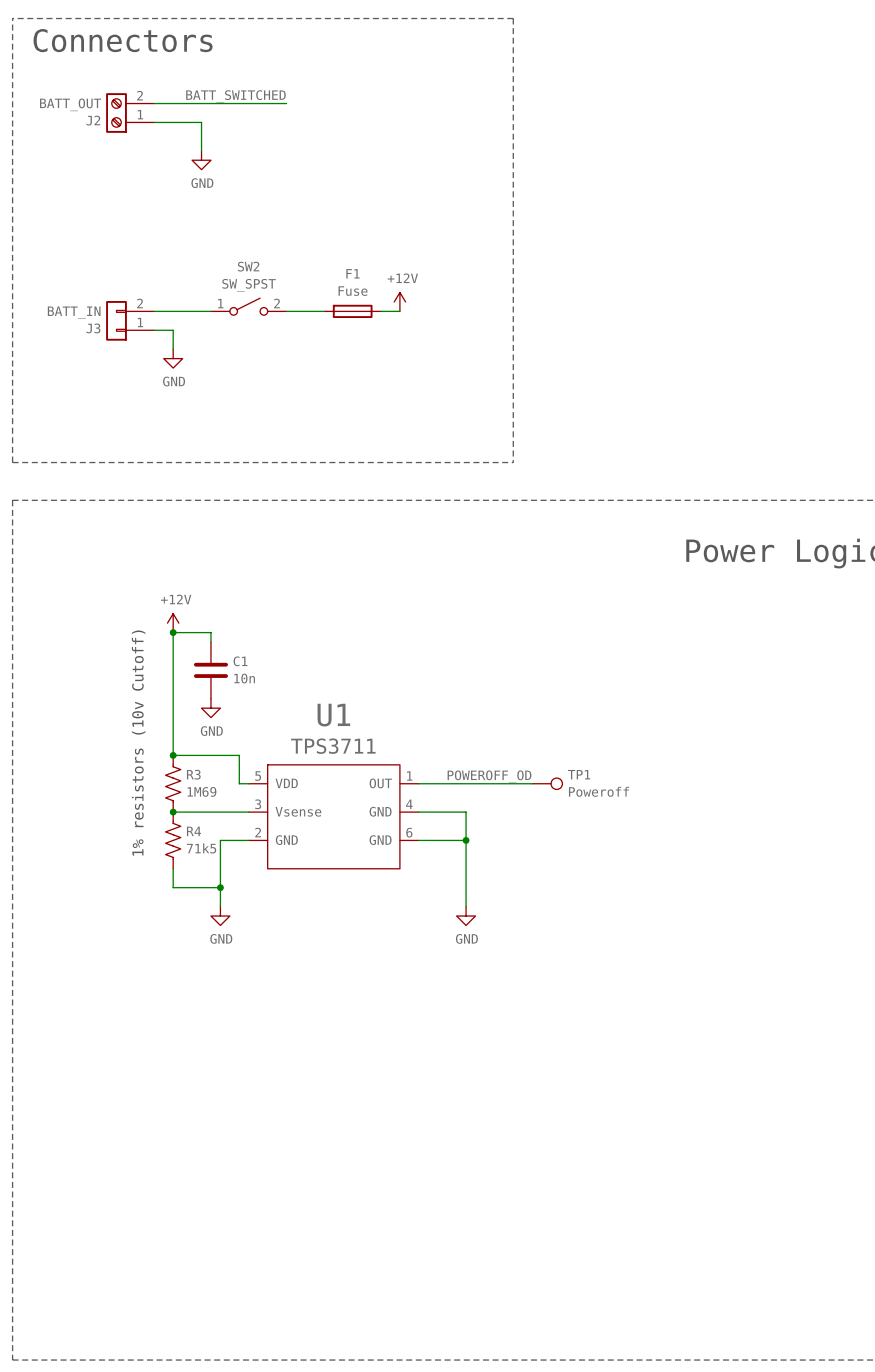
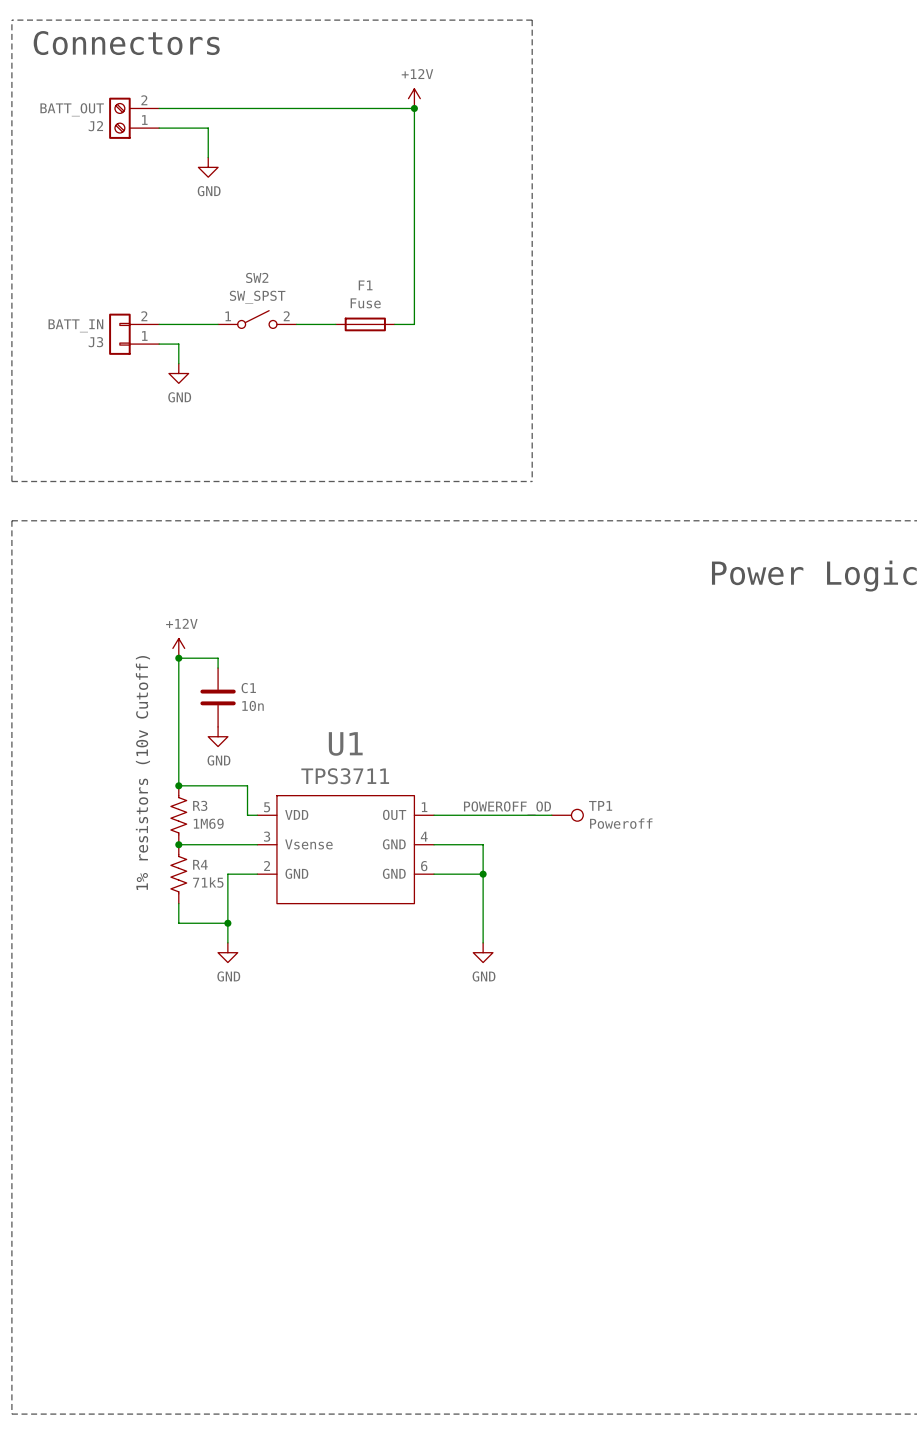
power symbol: none -> +12V (414, 98)
label: BATT_SWITCHED (235, 96) -> none
wire: none -> (296, 108) (414, 108) (414, 324)
junction: none -> (414, 108)
power symbol: +12V (399, 301) -> none

